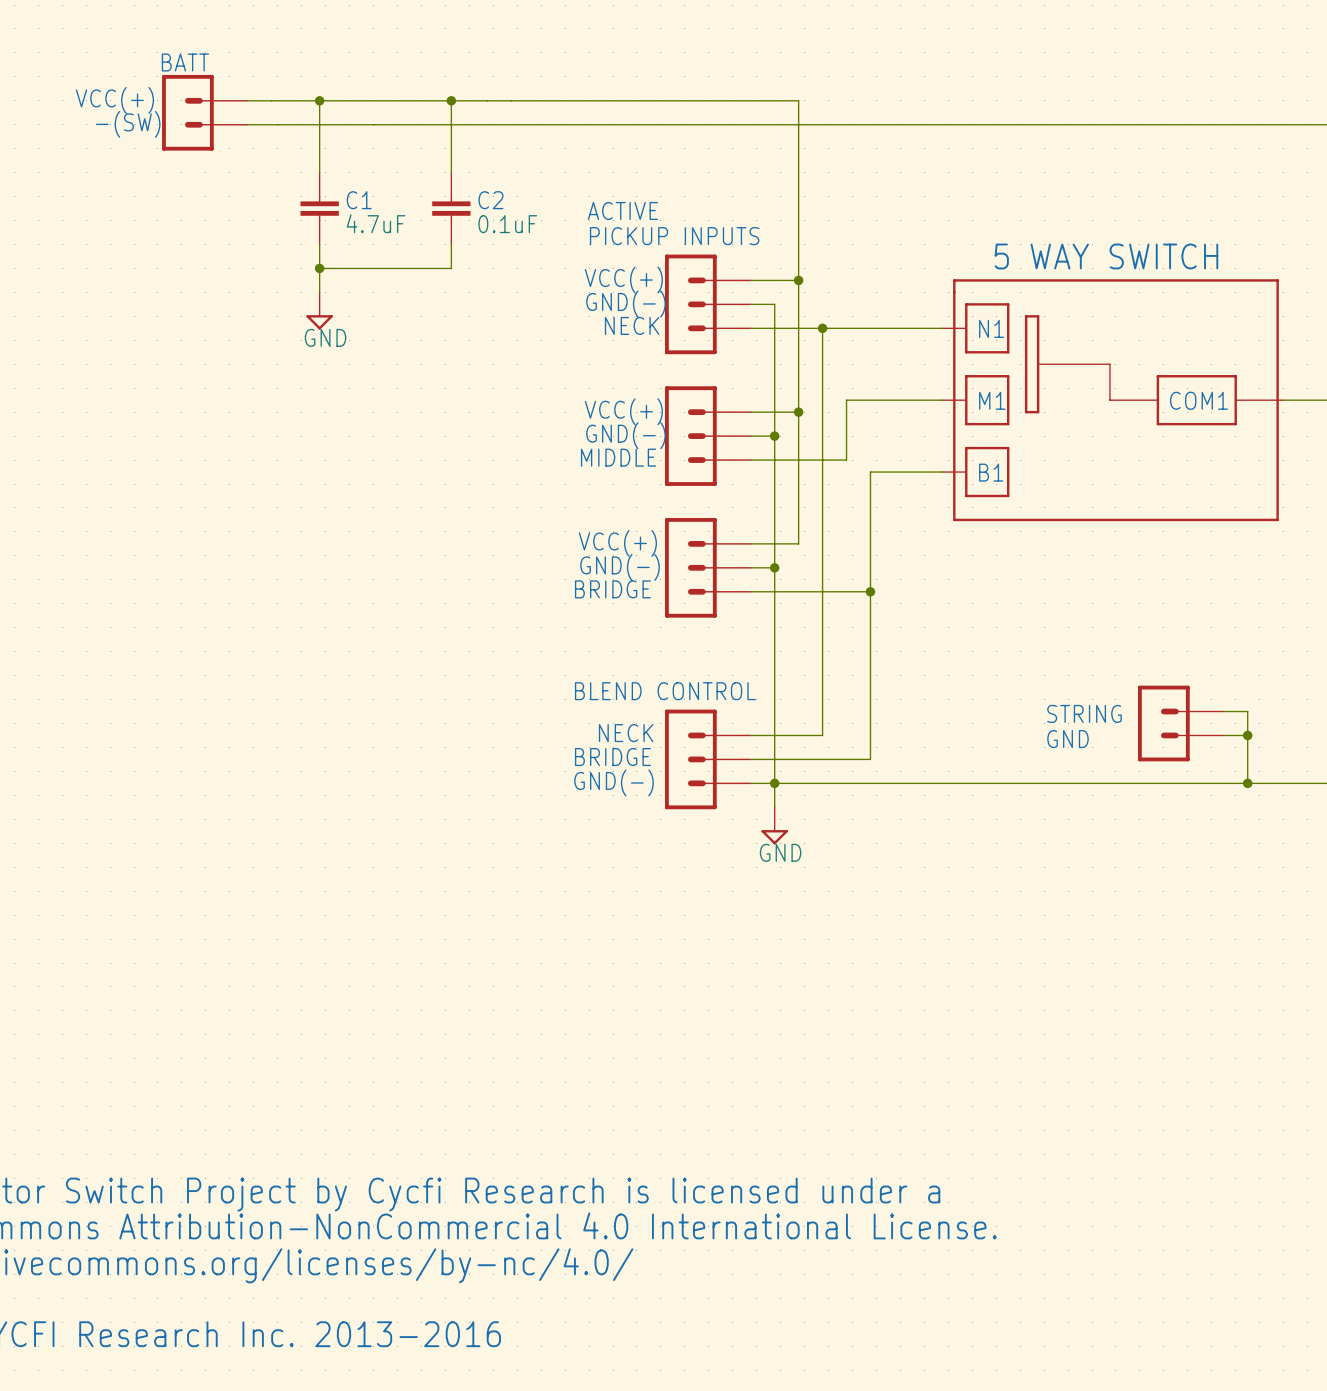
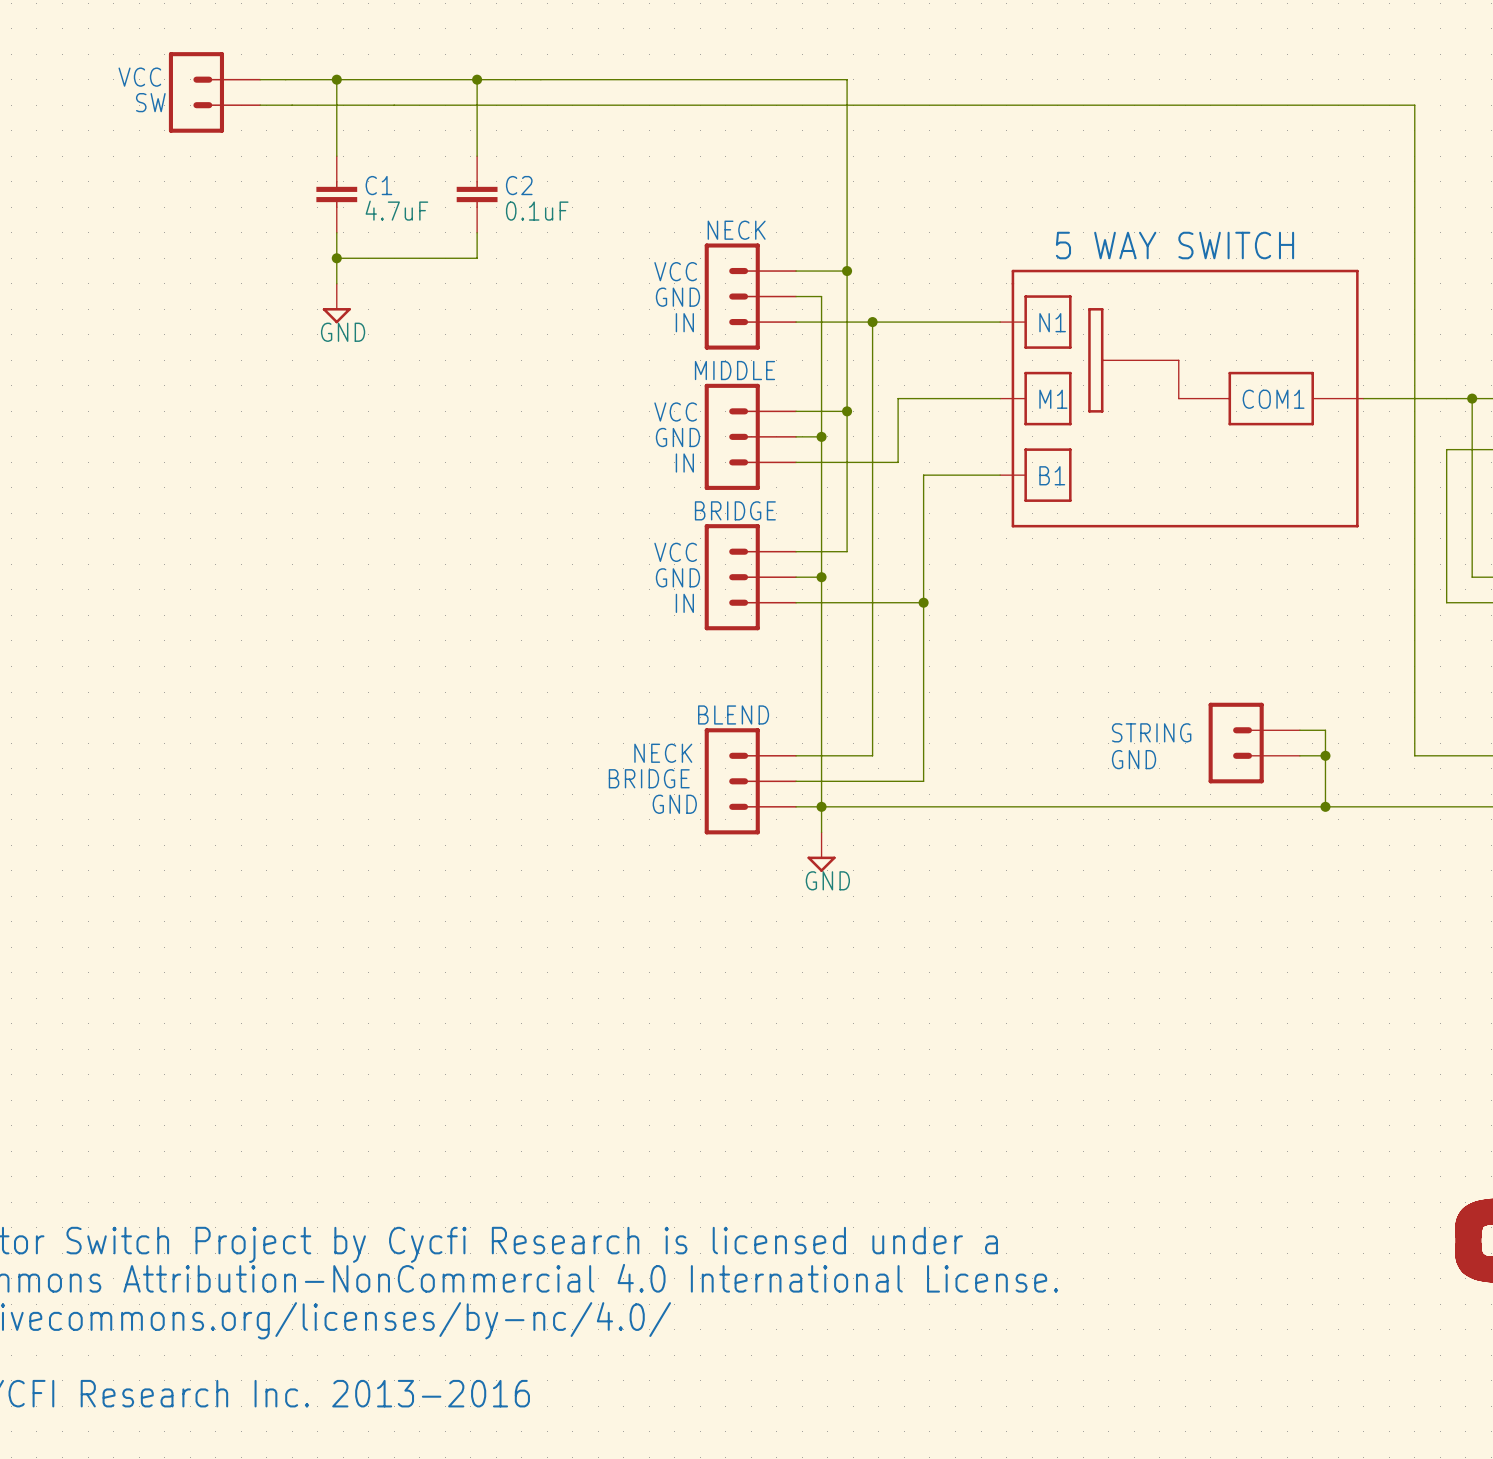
text: BATT (185, 62) -> none
text: VCC(+) (114, 100) -> VCC (139, 77)
text: none -> SW (150, 102)
text: -(SW) (128, 124) -> none
text: ACTIVE (622, 210) -> none
text: PICKUP INPUTS (674, 236) -> none
text: VCC(+) (623, 280) -> VCC (675, 271)
text: GND(-) (626, 303) -> GND (677, 297)
text position: NECK (632, 325) -> NECK (736, 230)
text: none -> IN (684, 322)
text: VCC(+) (623, 411) -> VCC (675, 412)
text: GND(-) (626, 435) -> GND (677, 437)
text position: MIDDLE (618, 457) -> MIDDLE (734, 370)
text: none -> IN (684, 463)
text: VCC(+) (617, 543) -> VCC (675, 552)
text: GND(-) (620, 567) -> GND (677, 577)
text position: BRIDGE (612, 589) -> BRIDGE (735, 510)
text: none -> IN (684, 603)
text: BLEND CONTROL (665, 691) -> none
text: none -> BLEND (733, 714)
text: GND(-) (614, 782) -> GND (674, 804)

